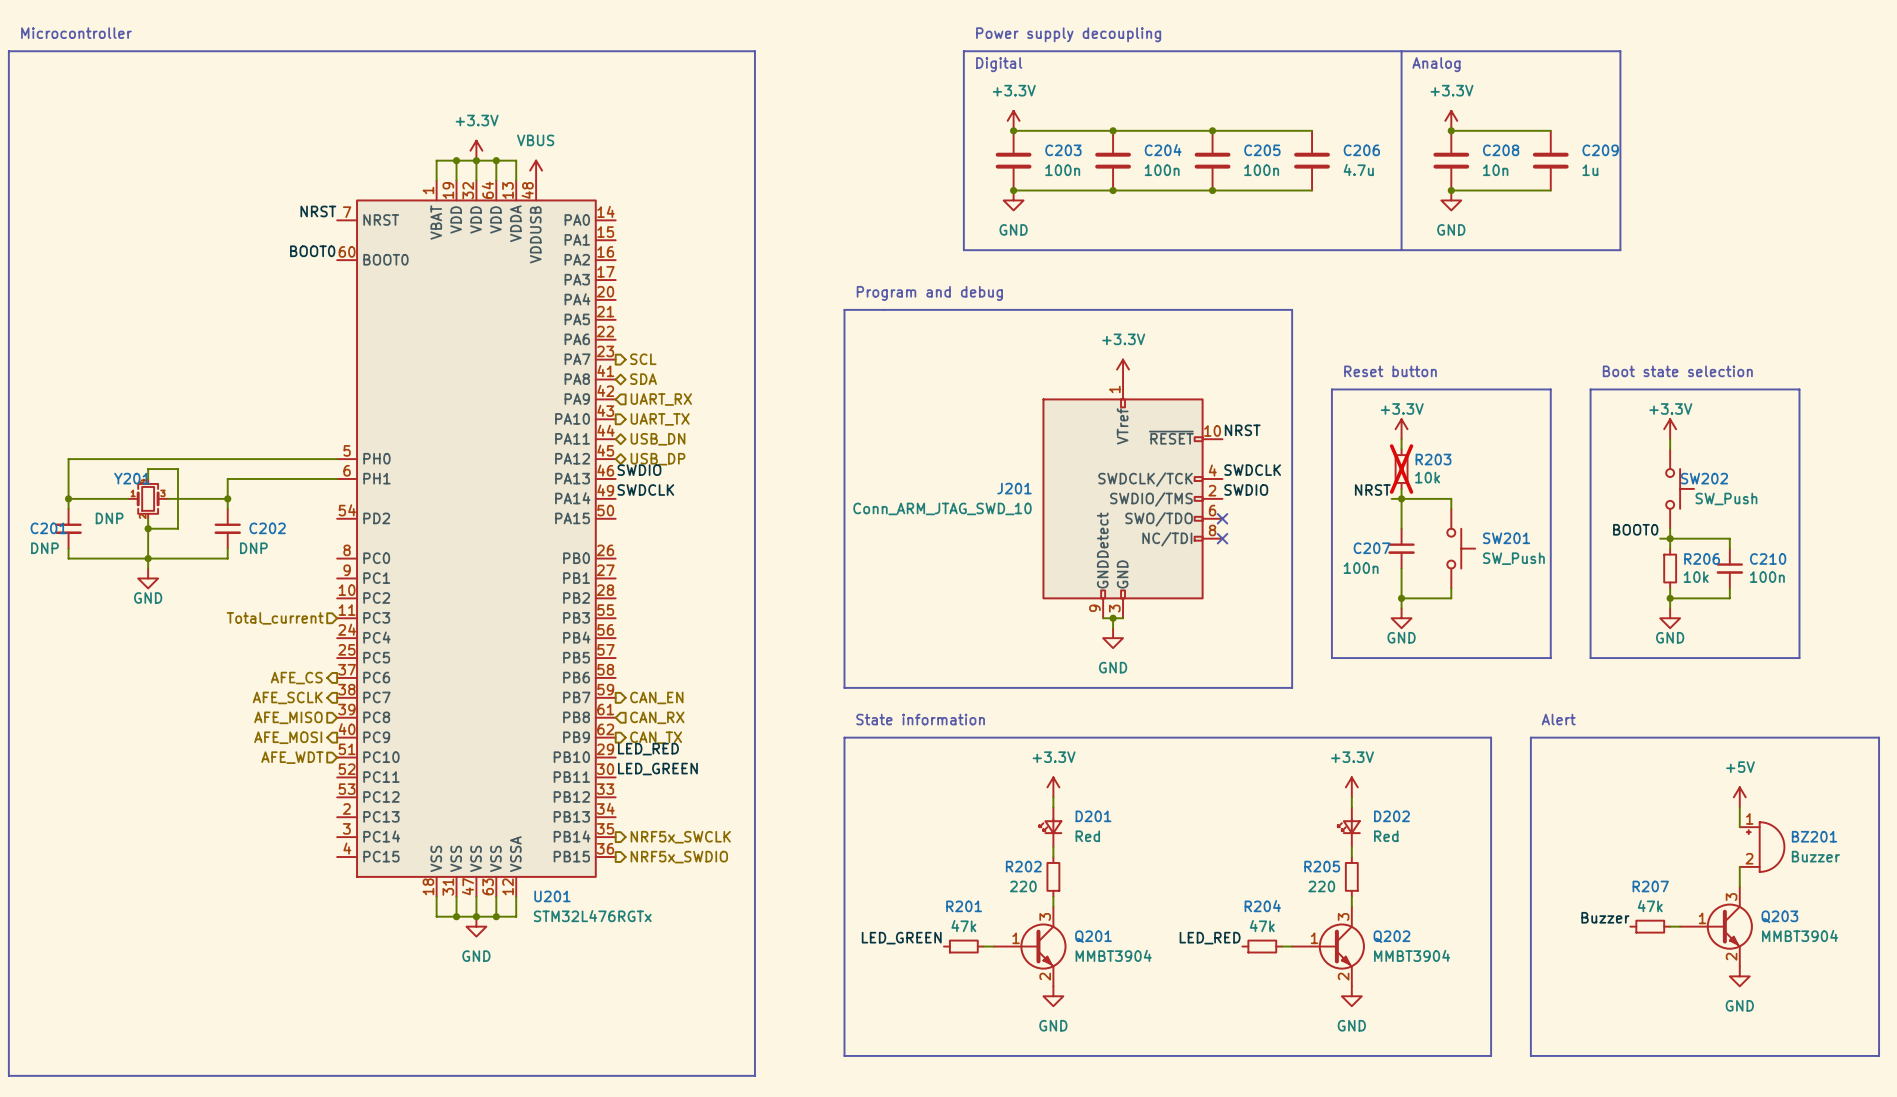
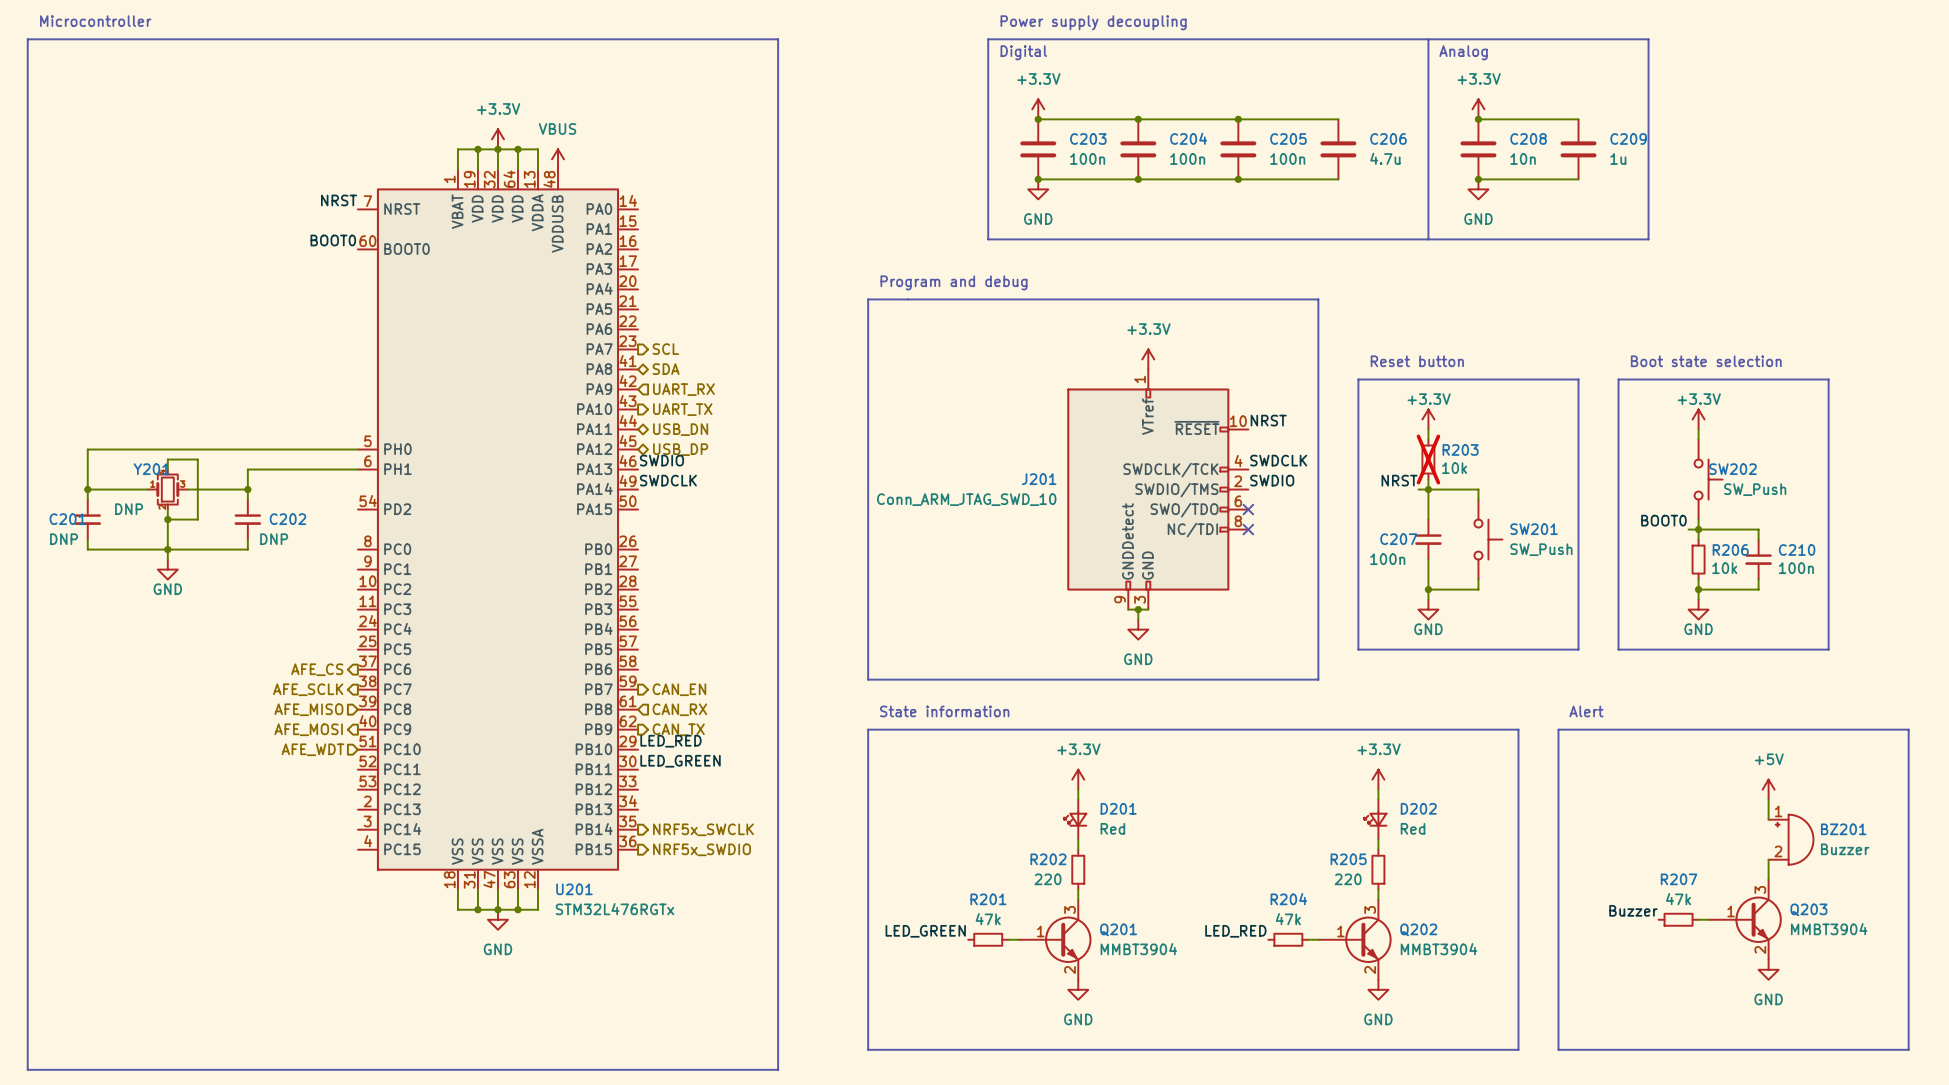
hierarchical label: Total_current (275, 618) -> none

